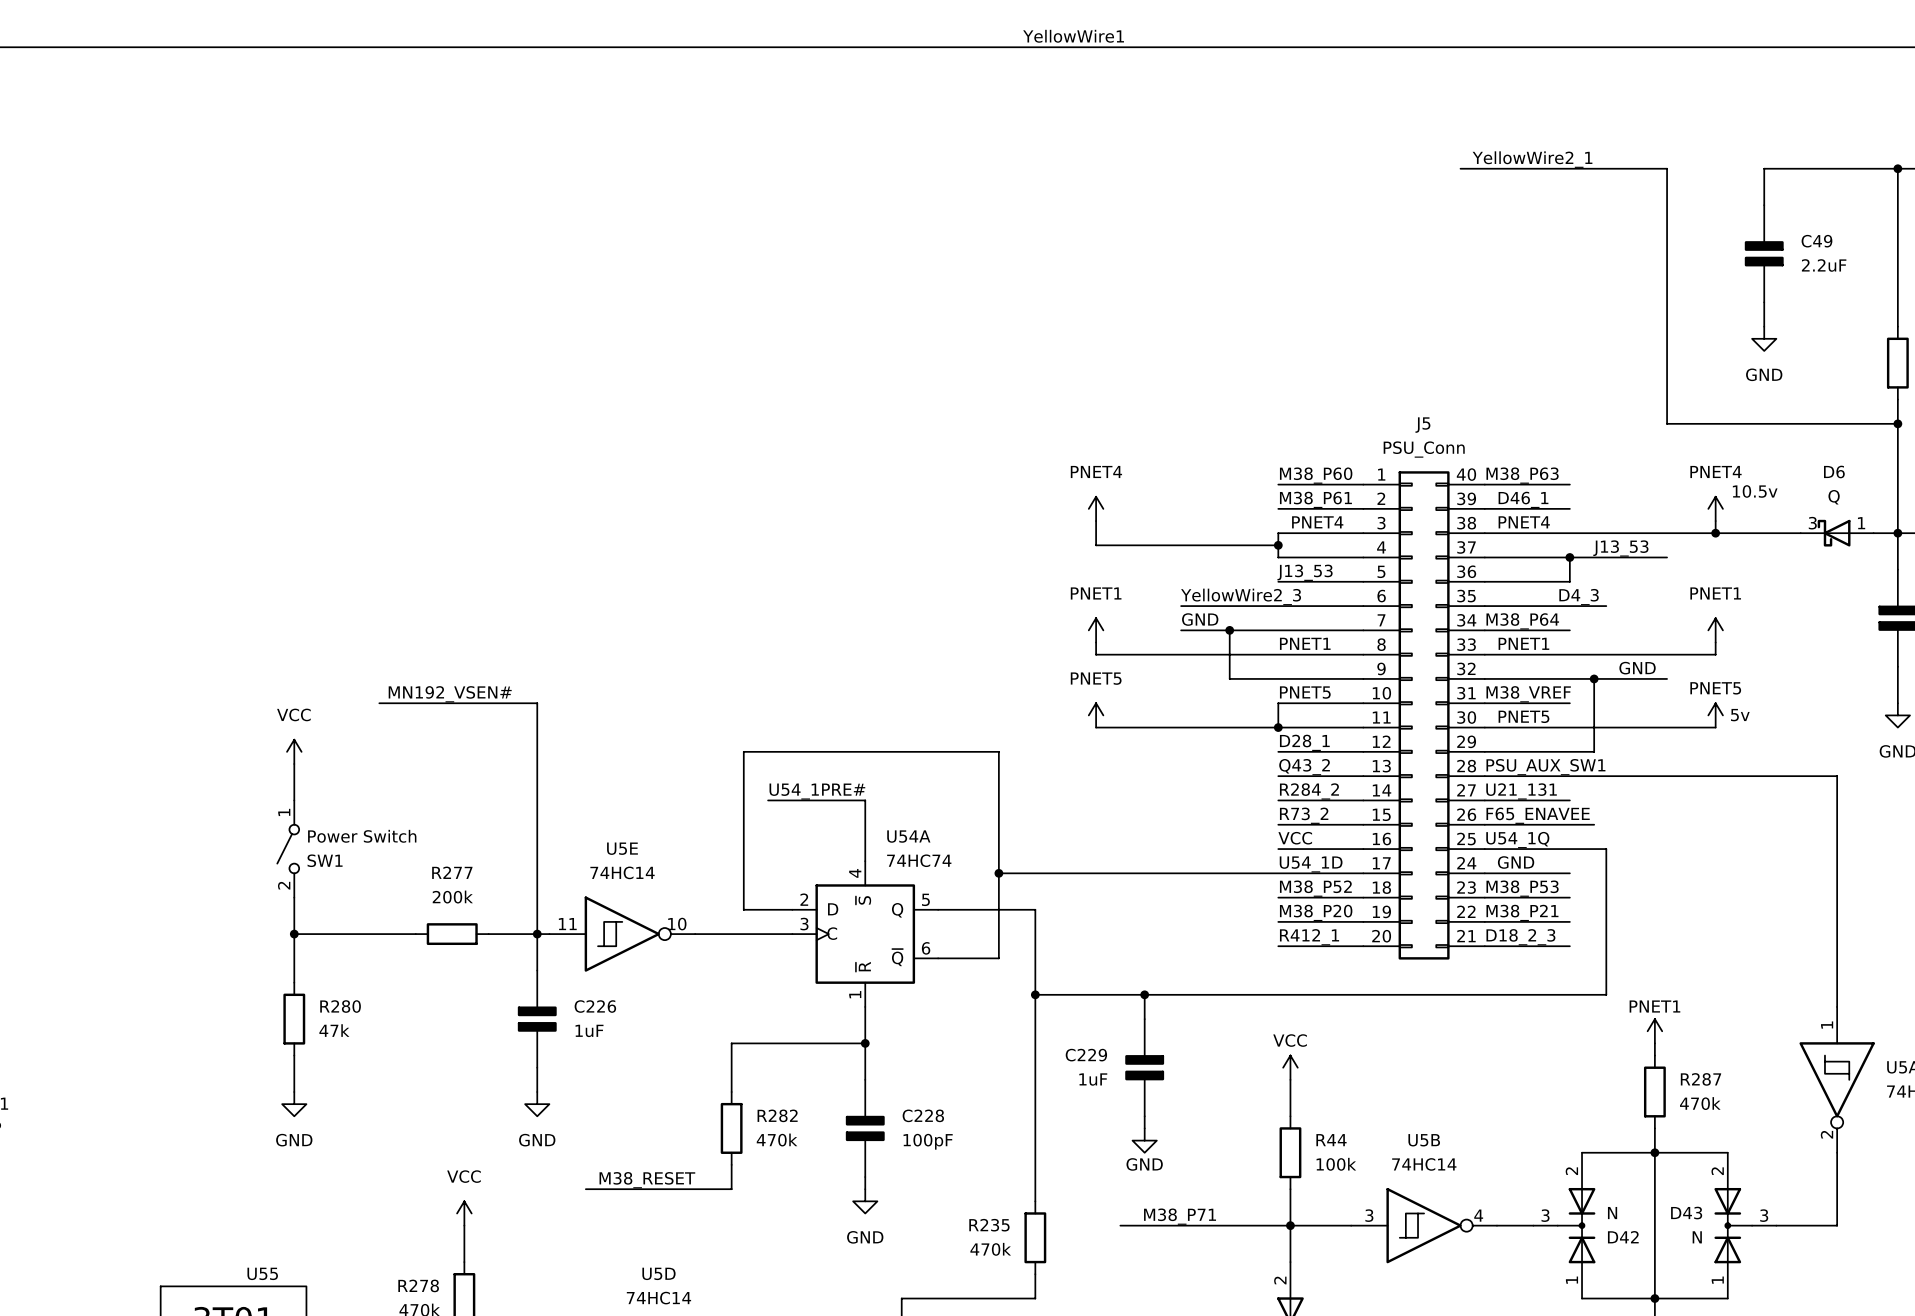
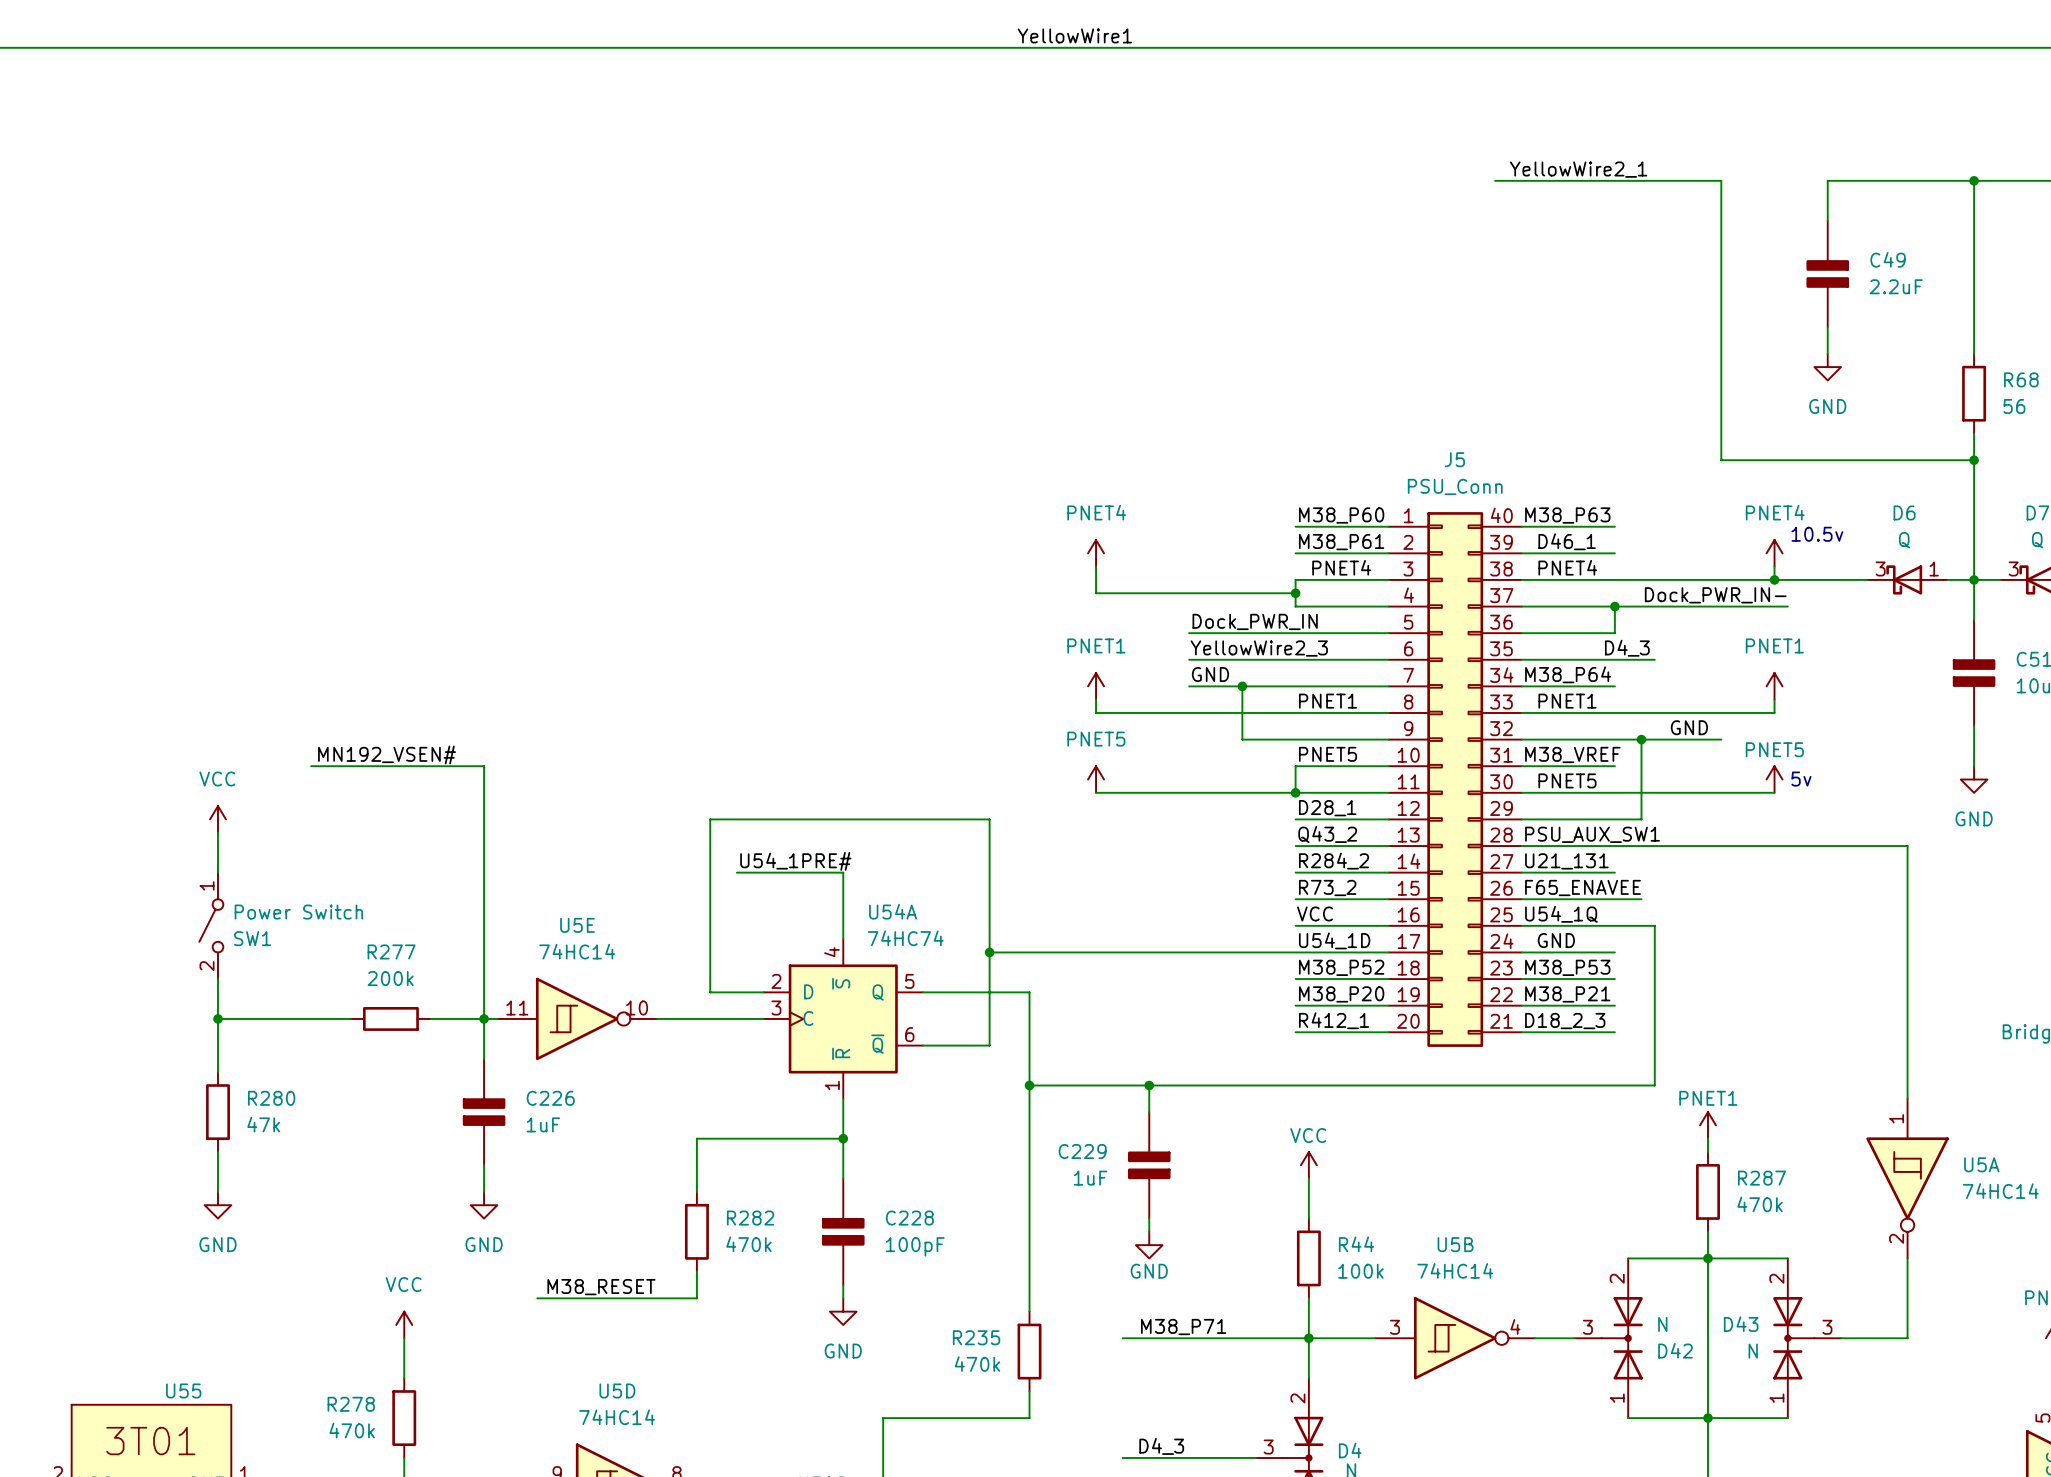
label: J13_53 (1620, 548) -> Dock_PWR_IN- (1715, 595)
wire: none -> (1721, 606) (1787, 606)
label: none -> Dock_PWR_IN (1255, 621)
label: J13_53 (1305, 572) -> none
wire: none -> (1189, 633) (1295, 633)

